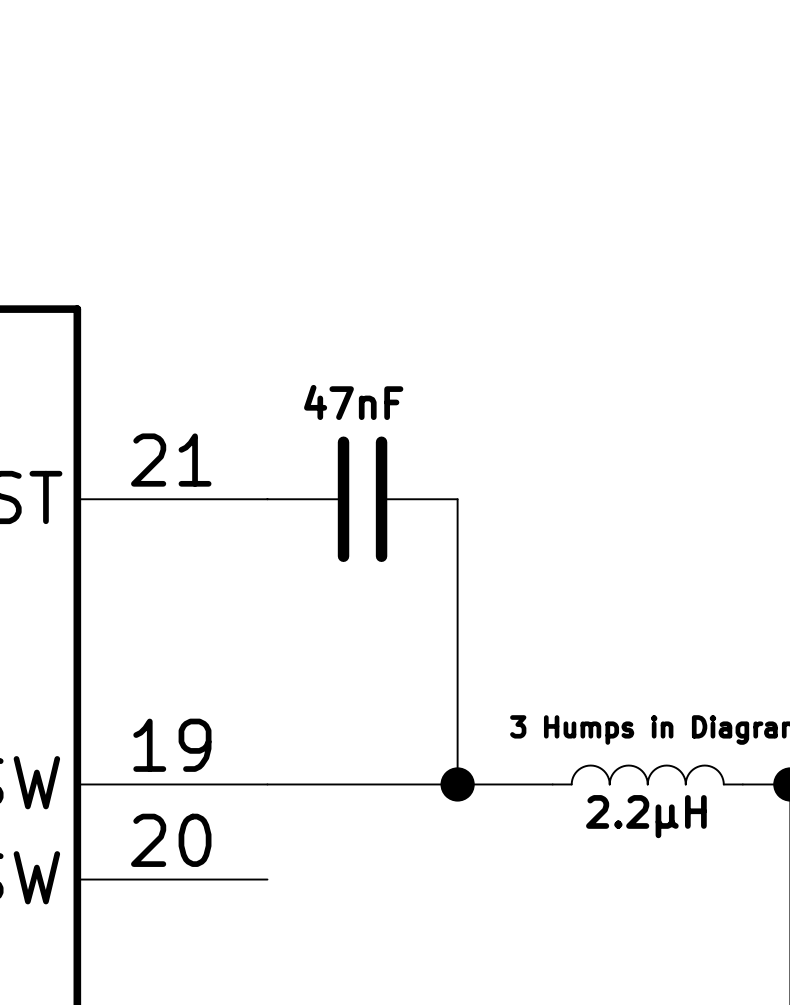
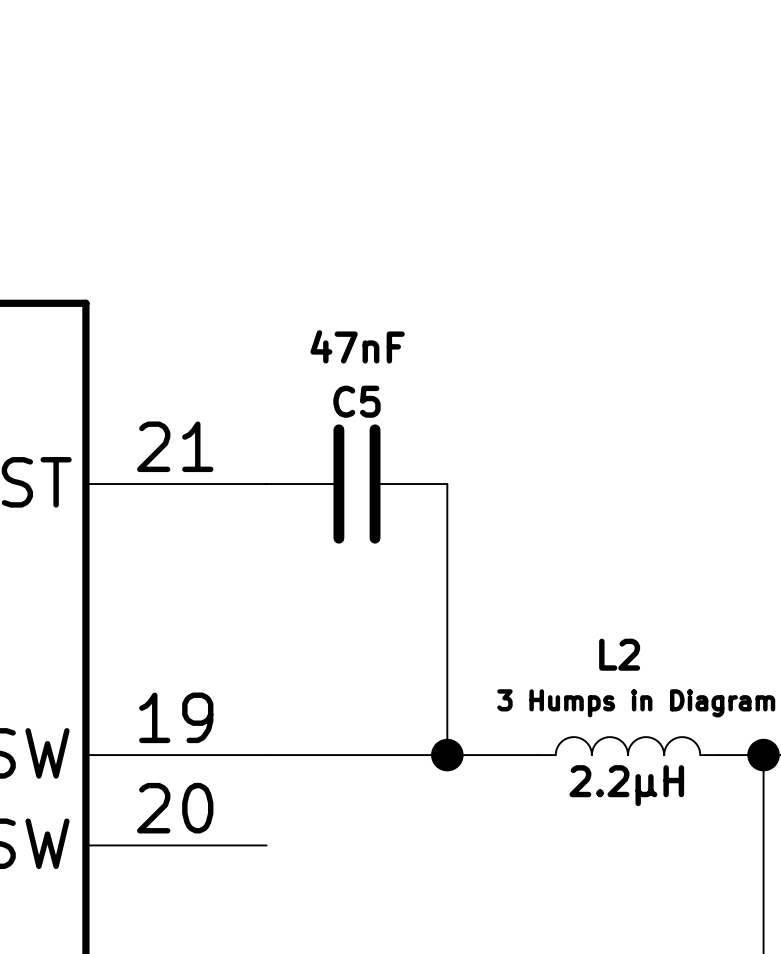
C5 value position: 47nF (353, 402) -> 47nF (357, 346)
C5 name: none -> C5 (356, 401)
L2 name: none -> L2 (619, 654)

